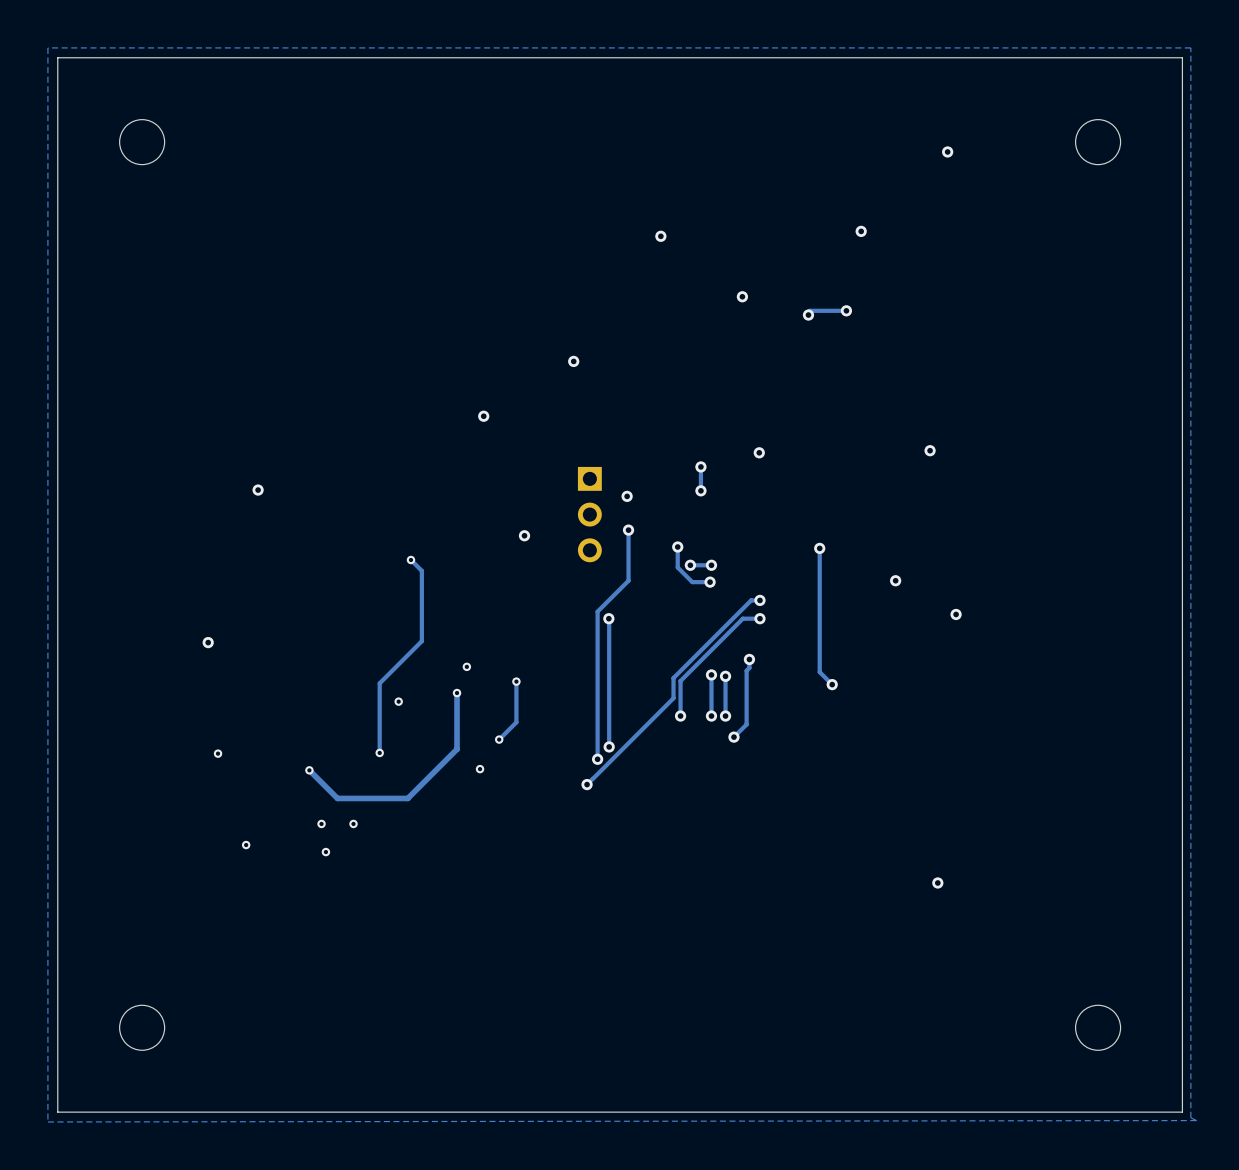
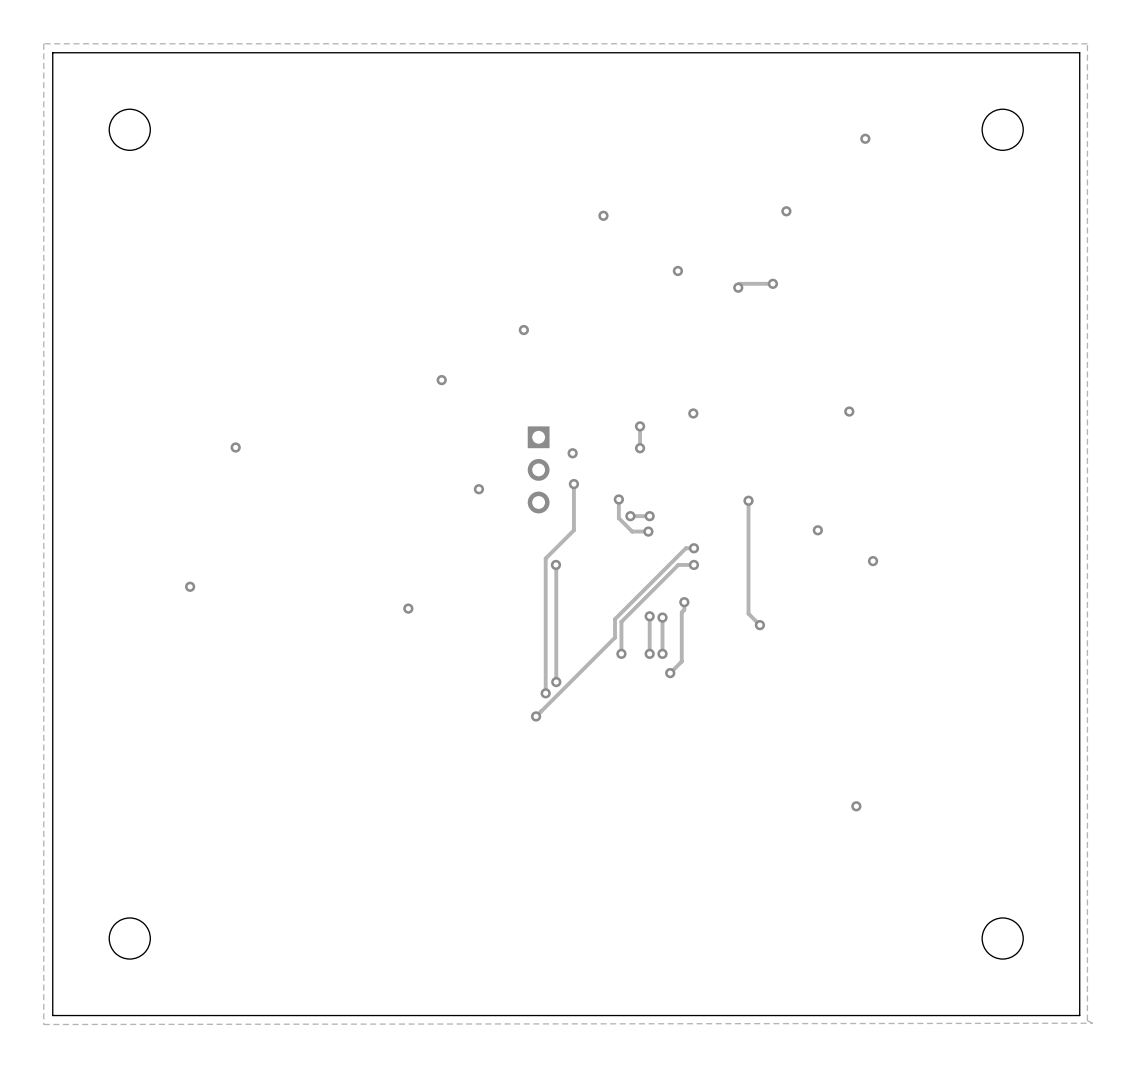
track: (410, 560) (421, 570) (421, 641) (379, 683) (379, 752) -> none
via: (410, 560) -> none
via: none -> (408, 608)
via: (466, 666) -> none
track: (516, 681) (516, 722) (499, 739) -> none
via: (516, 681) -> none
track: (457, 693) (457, 749) (407, 798) (337, 798) (309, 770) -> none
via: (457, 693) -> none
via: (398, 701) -> none
via: (499, 739) -> none
via: (379, 752) -> none
via: (218, 753) -> none
via: (480, 769) -> none
via: (309, 770) -> none
via: (321, 823) -> none
via: (353, 823) -> none
via: (246, 845) -> none
via: (325, 852) -> none

